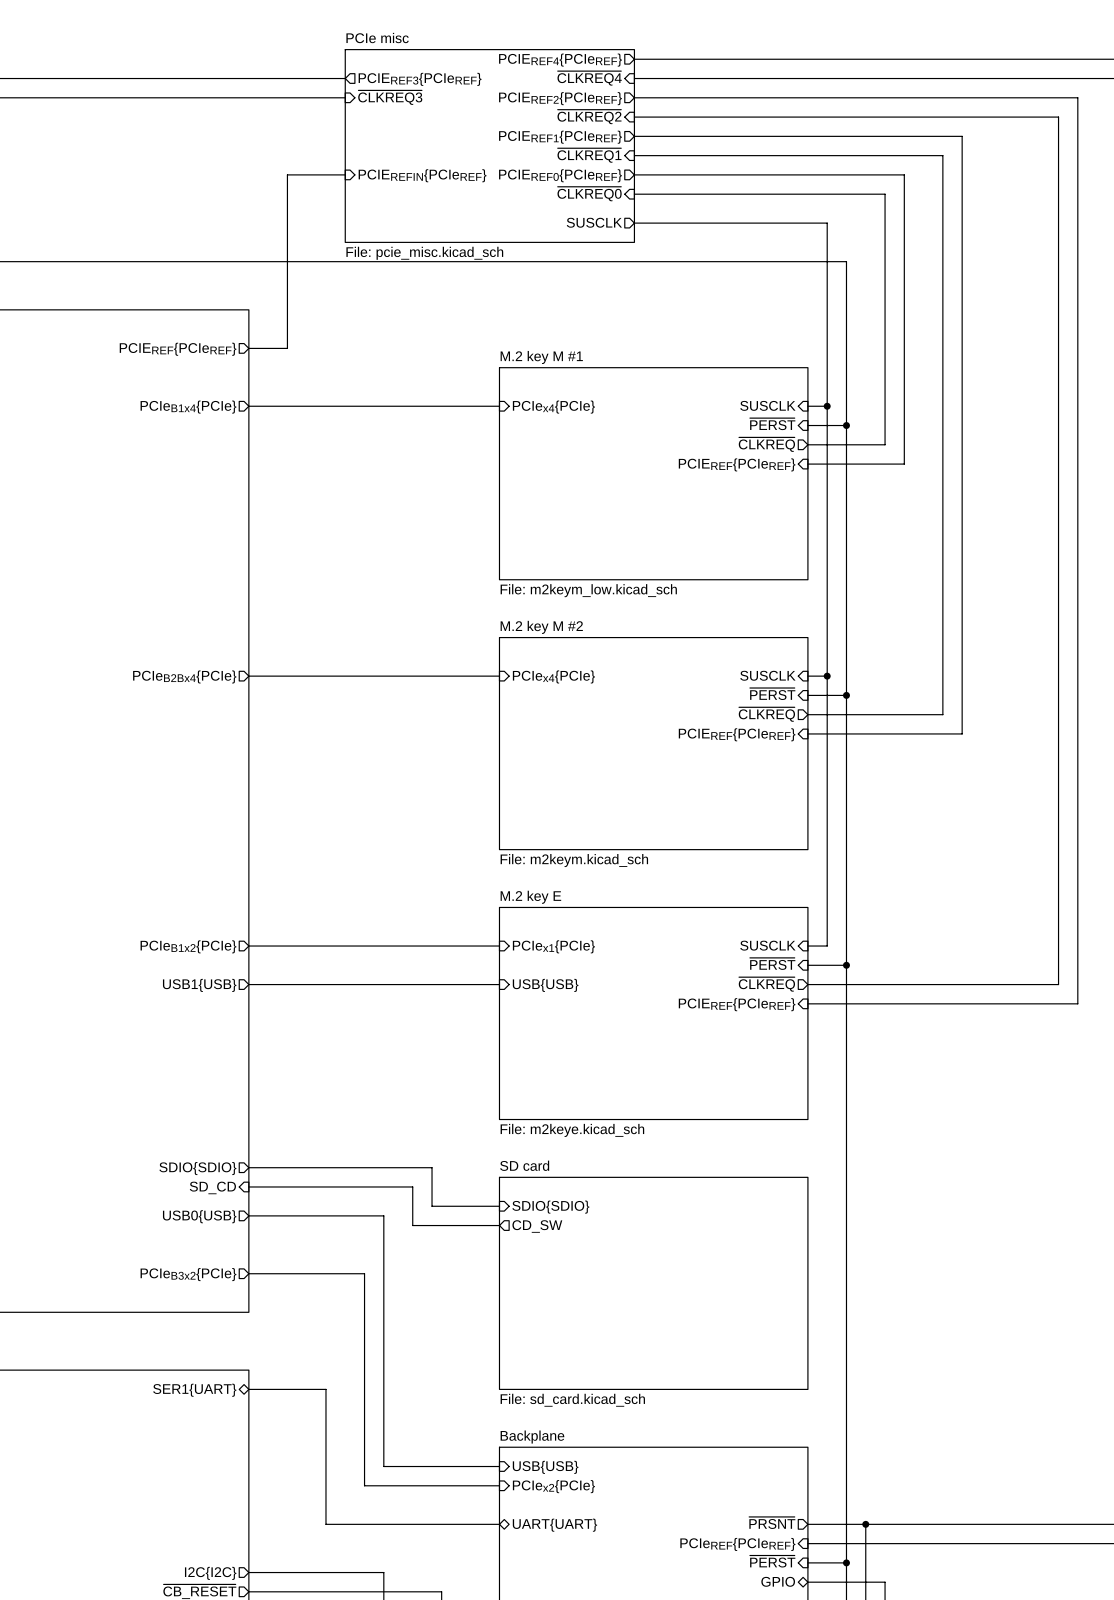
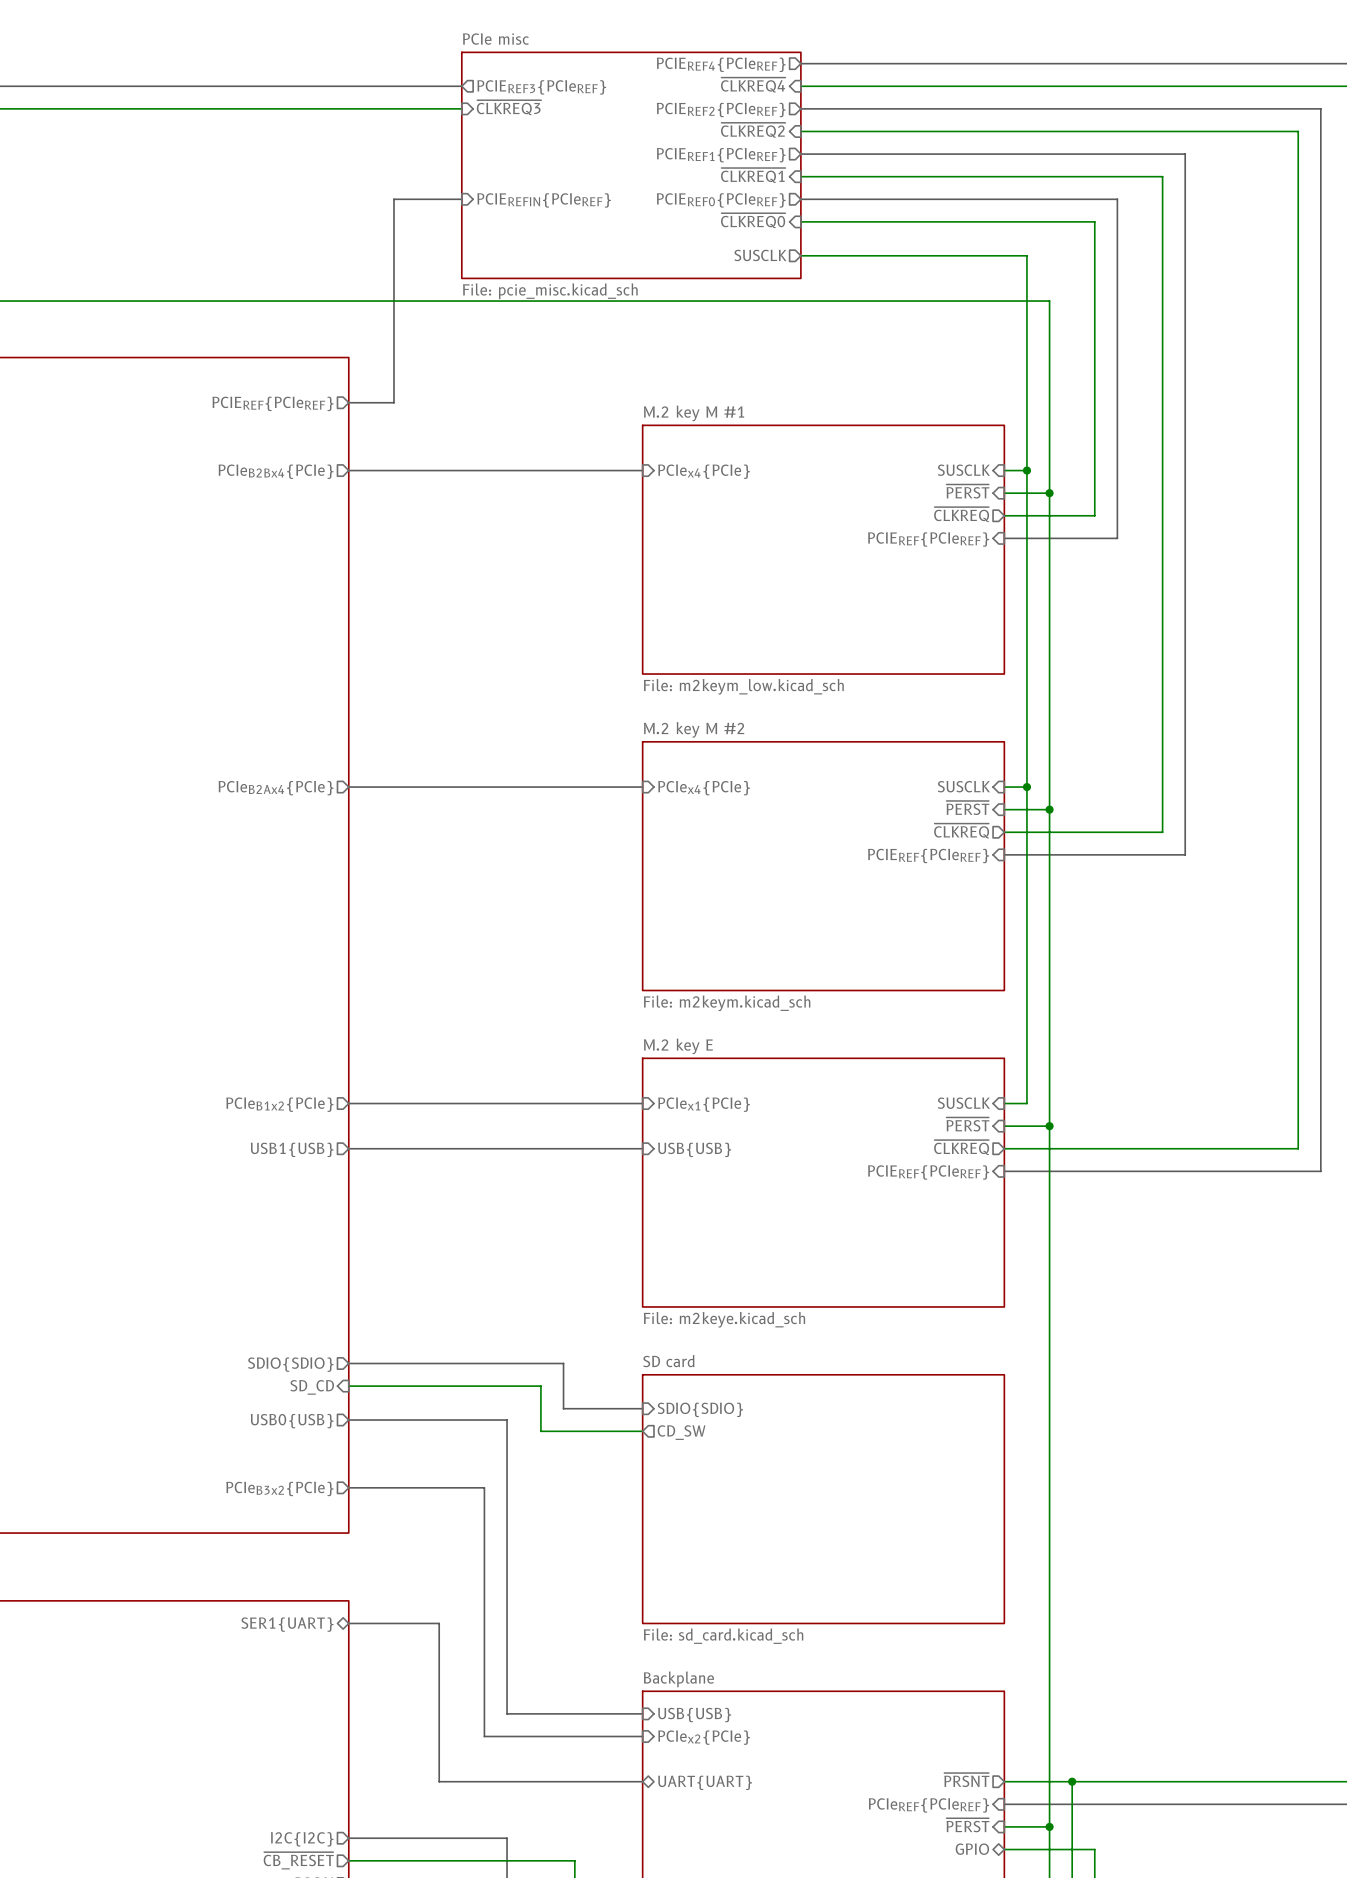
sheet pin: PCIeB1x4{PCIe} (188, 407) -> PCIeB2Bx4{PCIe} (276, 471)
sheet pin: PCIeB2Bx4{PCIe} (184, 676) -> PCIeB2Ax4{PCIe} (276, 788)

